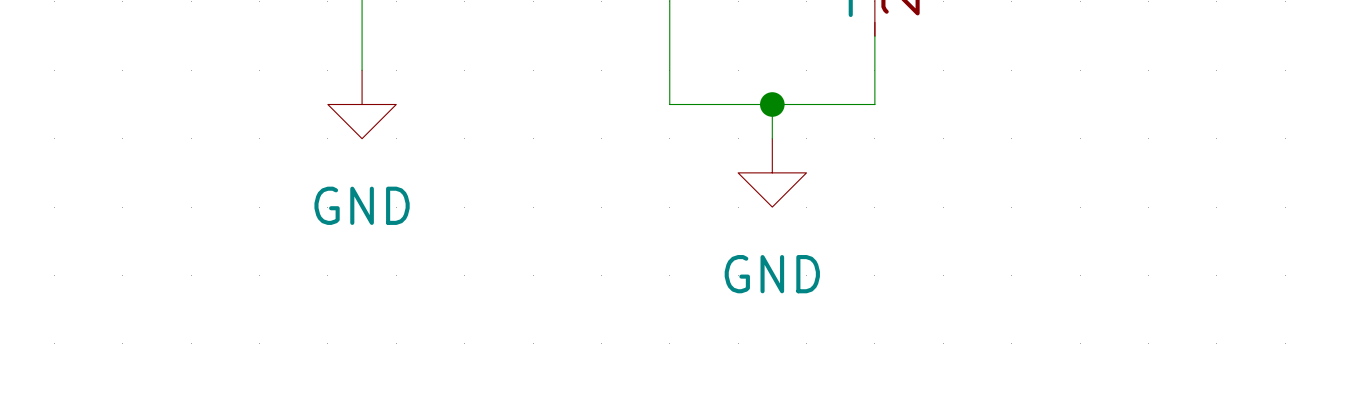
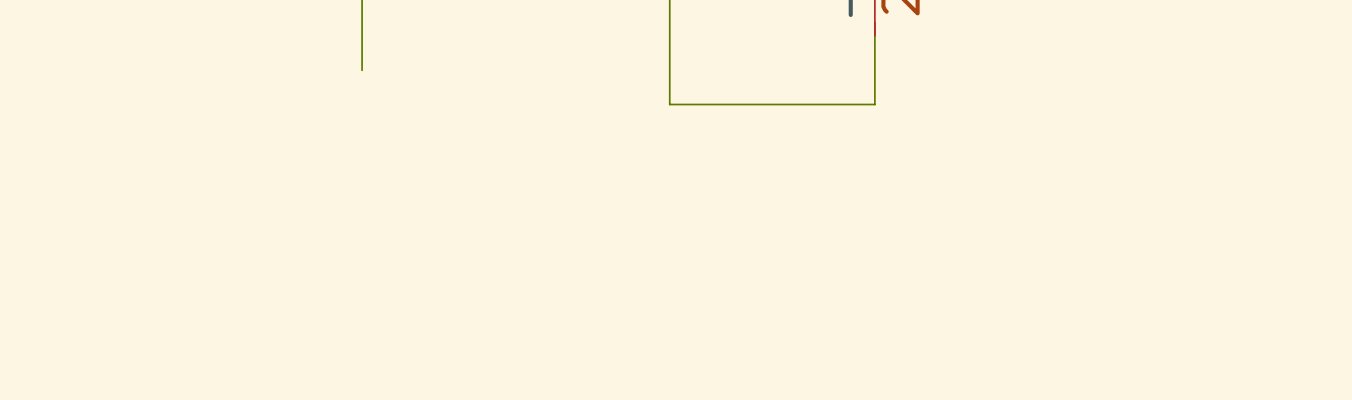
power symbol: GND (362, 104) -> none
wire: (772, 104) (772, 138) -> none
junction: (772, 104) -> none
power symbol: GND (772, 172) -> none

